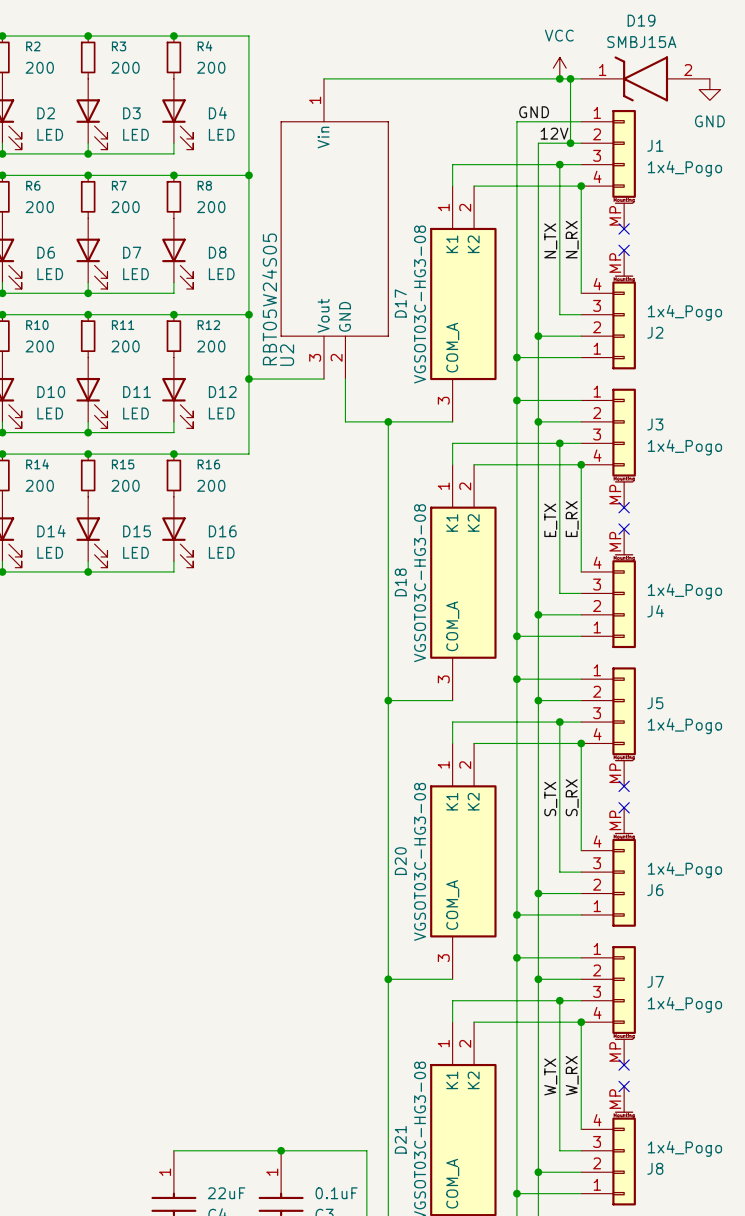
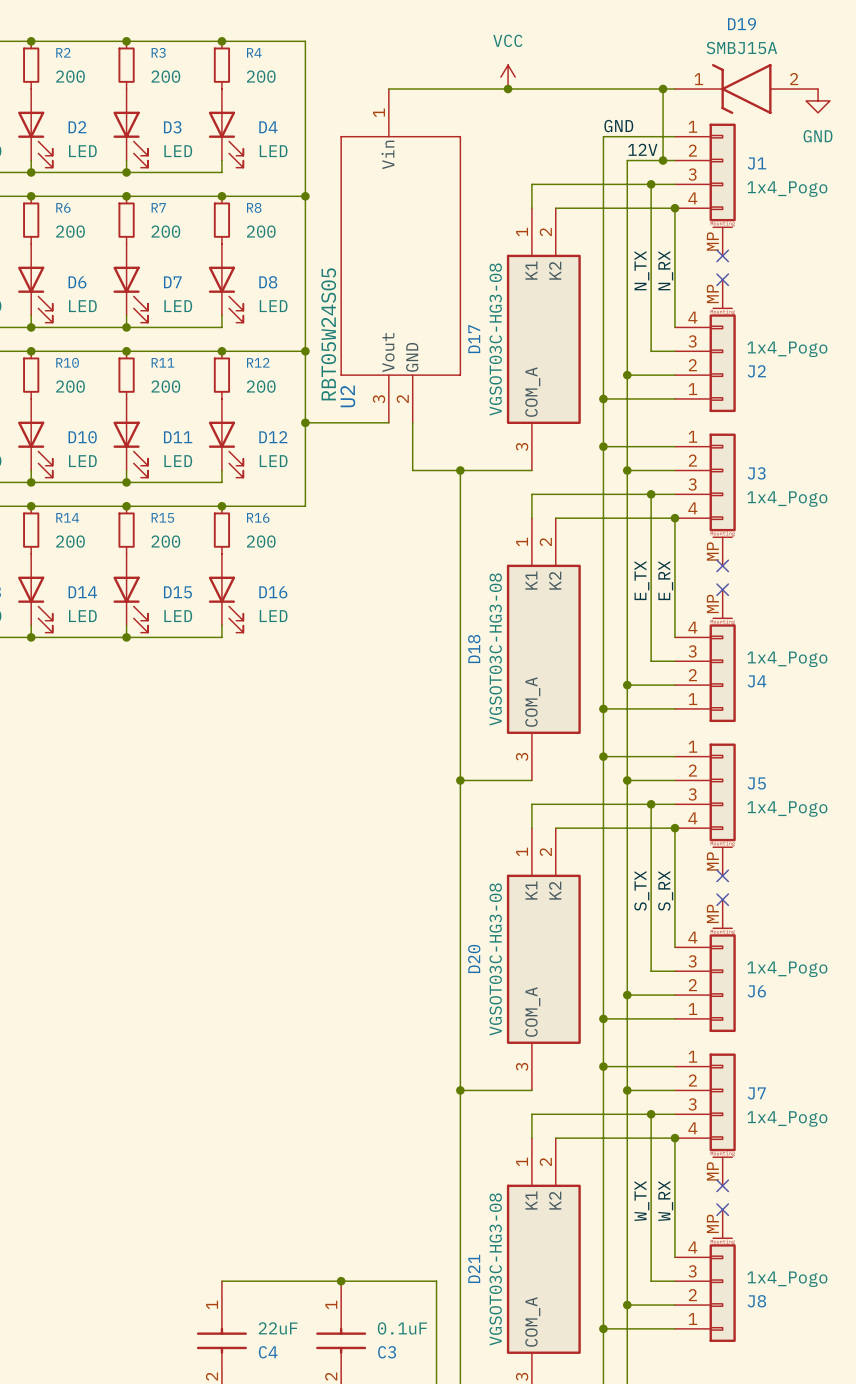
power symbol position: VCC (559, 68) -> VCC (508, 77)
junction: none -> (508, 89)
junction: (559, 78) -> none

